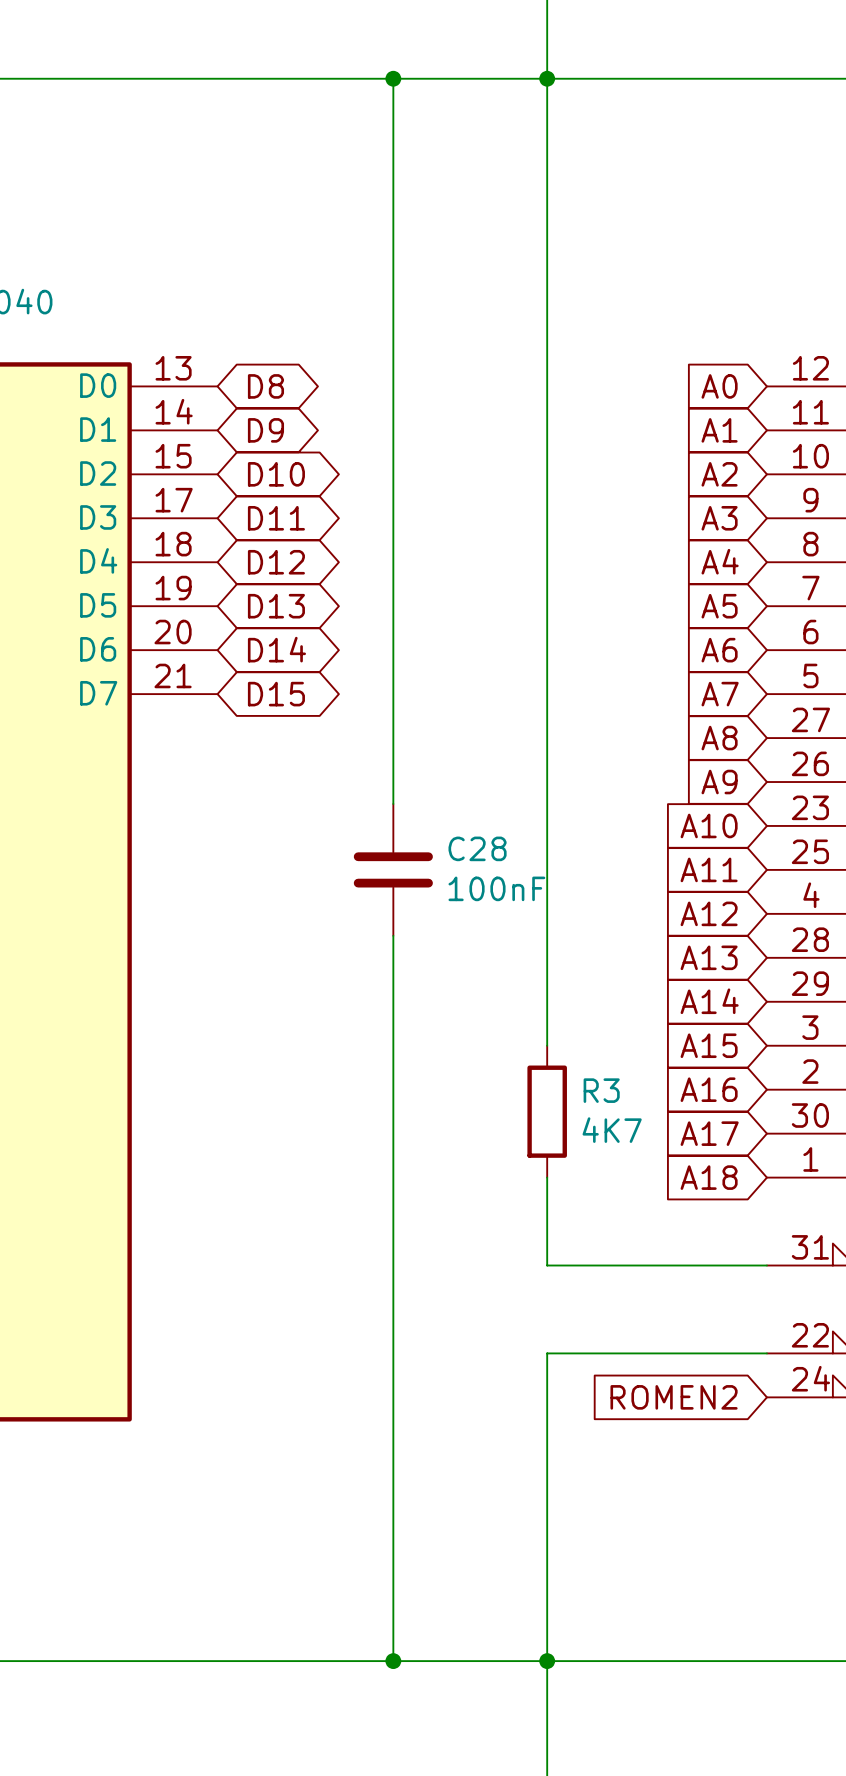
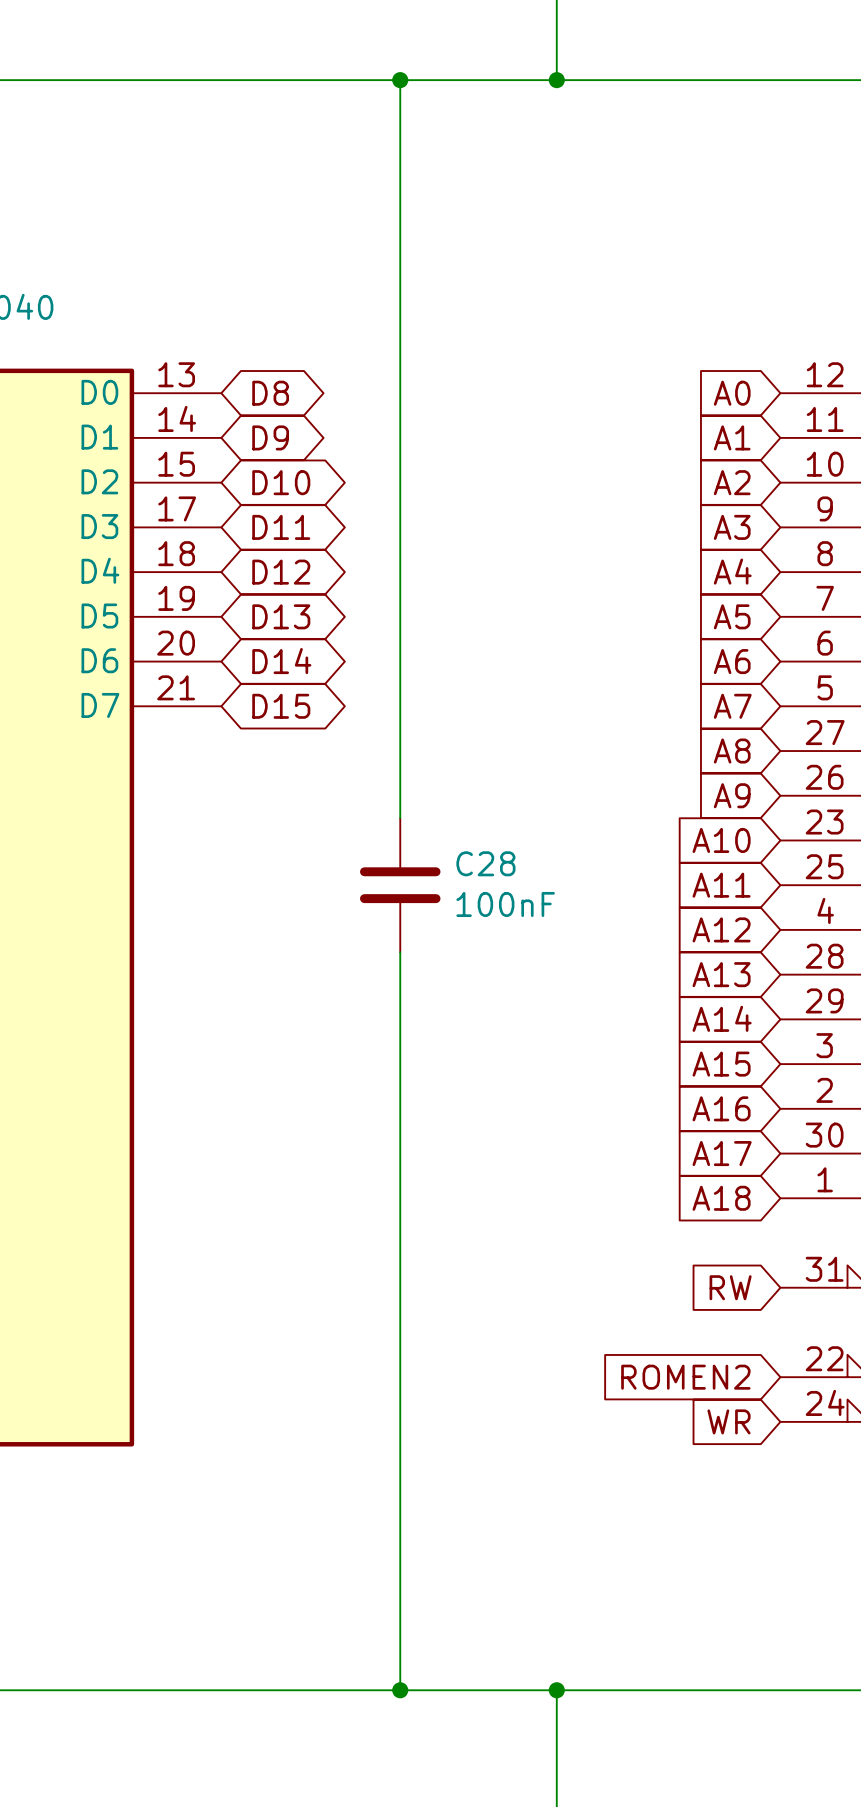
wire: (547, 78) (547, 1045) -> none
R3: 4K7 (547, 1111) -> none
wire: (547, 1177) (547, 1265) (766, 1265) -> none
global label: none -> RW (730, 1287)
global label: none -> ROMEN2 (685, 1377)
wire: (766, 1353) (547, 1353) (547, 1661) -> none
global label: ROMEN2 (674, 1397) -> WR (729, 1421)

